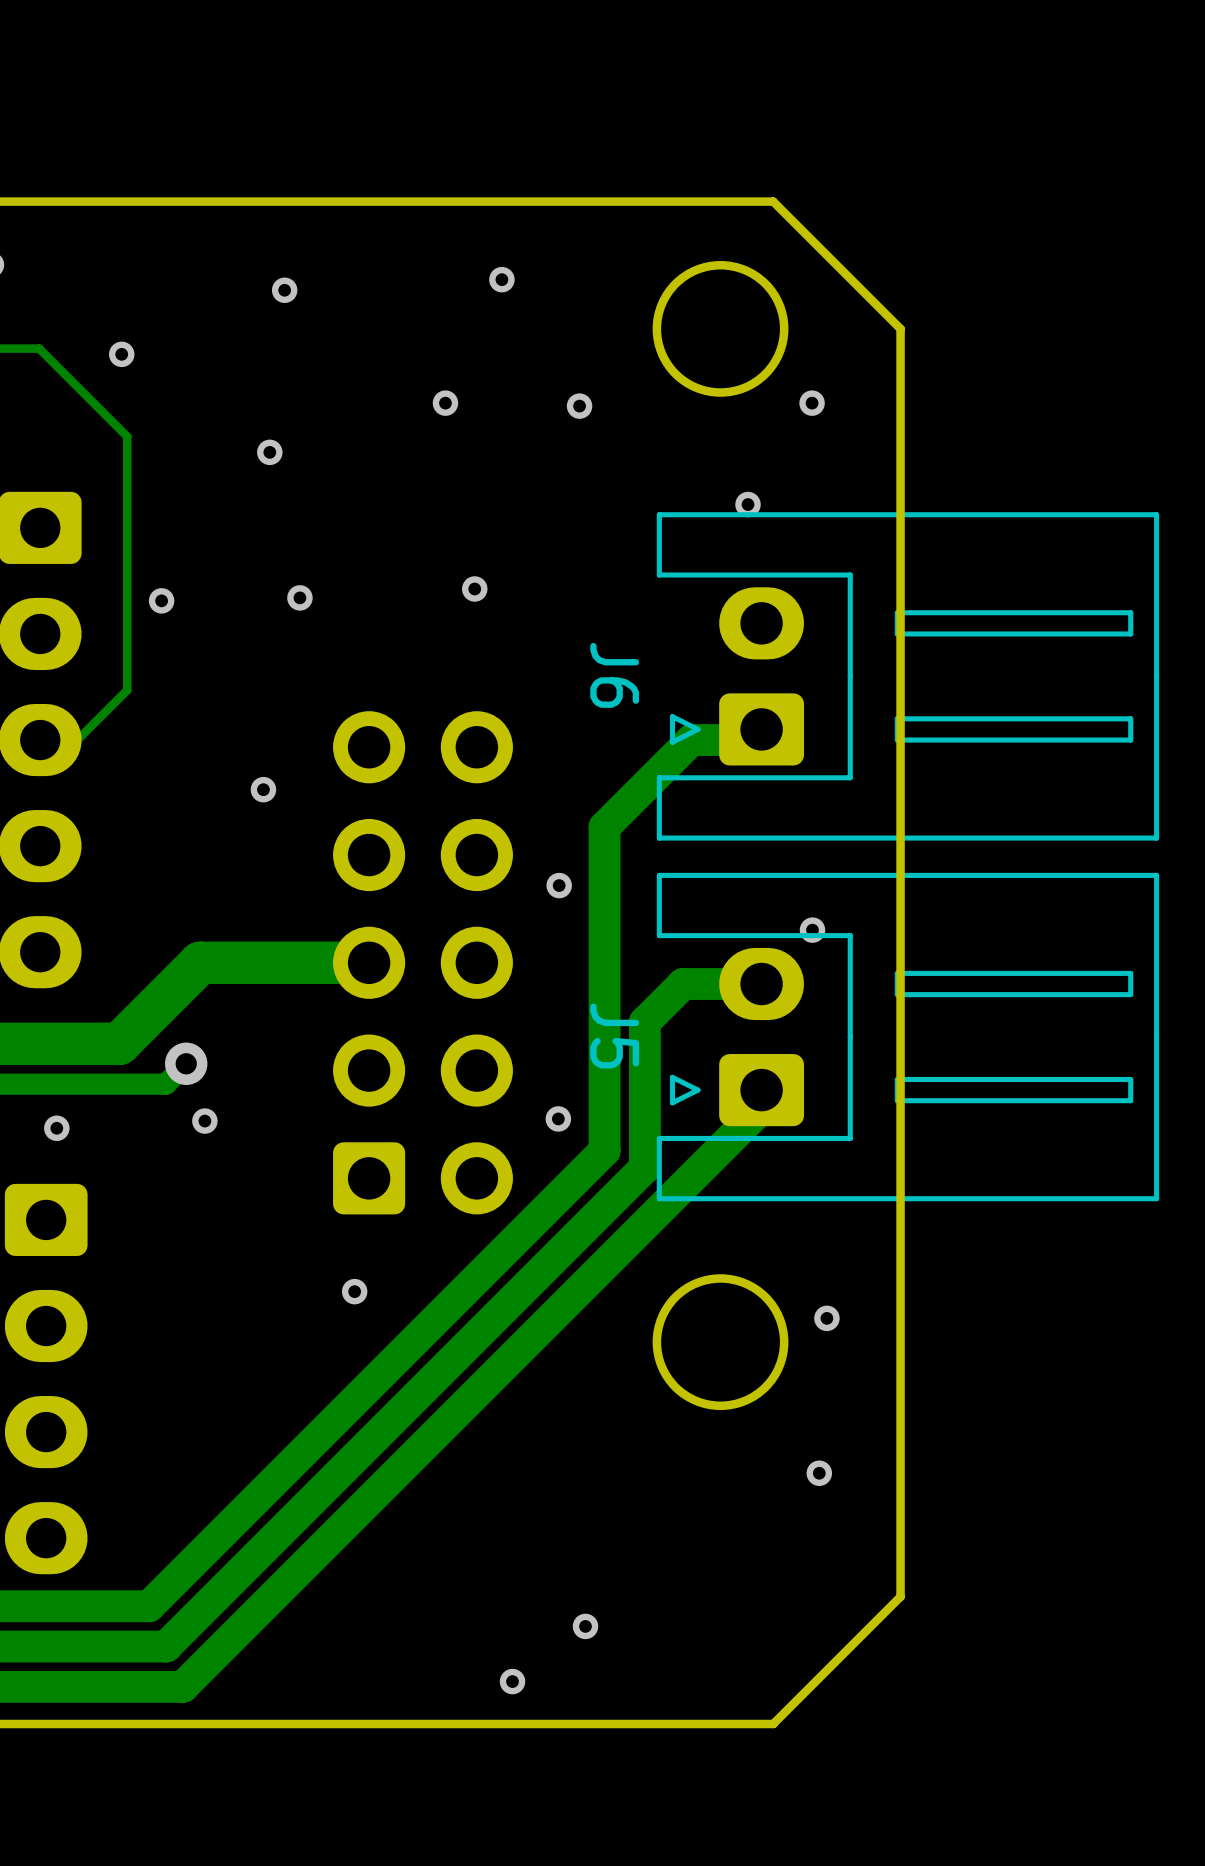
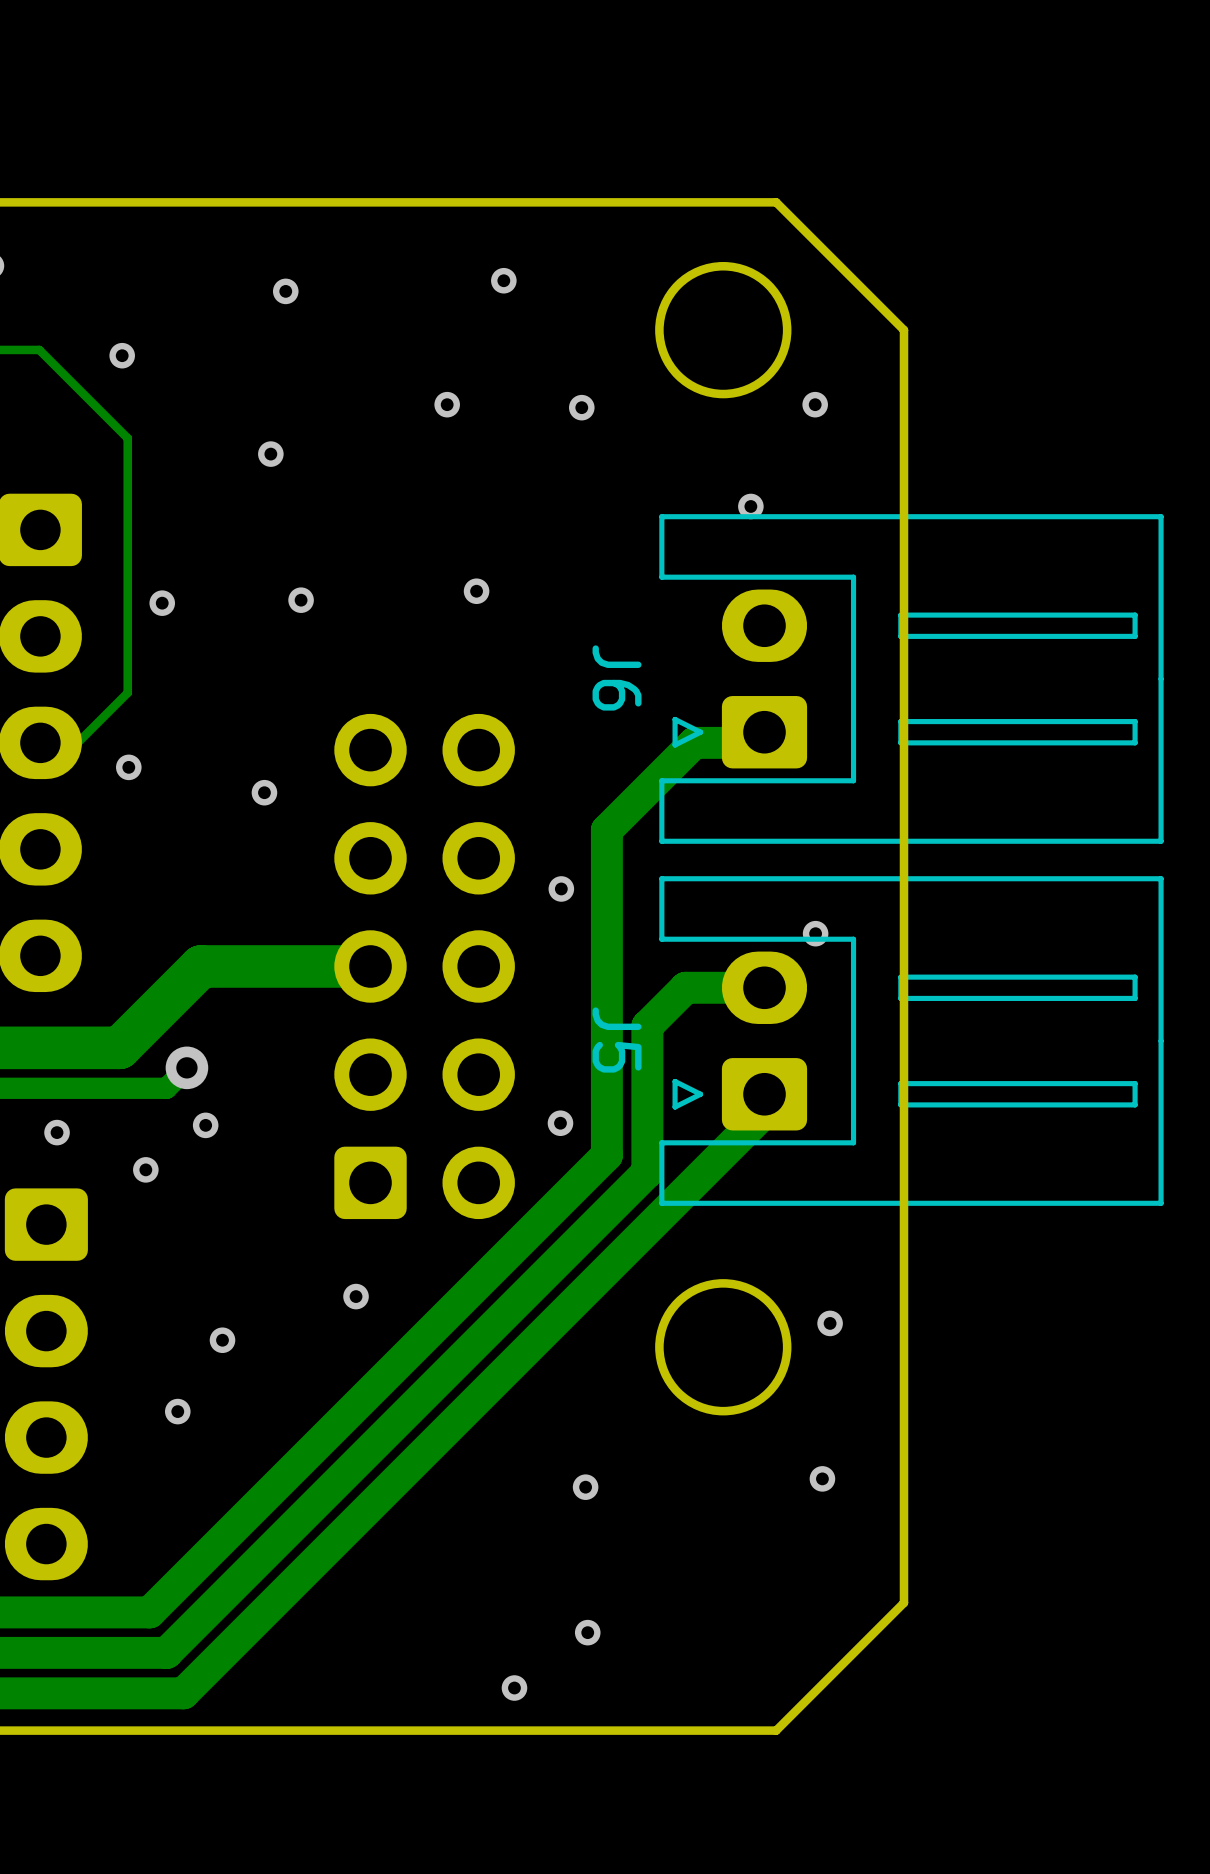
via: none -> (128, 767)
via: none -> (145, 1169)
via: none -> (222, 1340)
via: none -> (177, 1411)
via: none -> (585, 1487)

